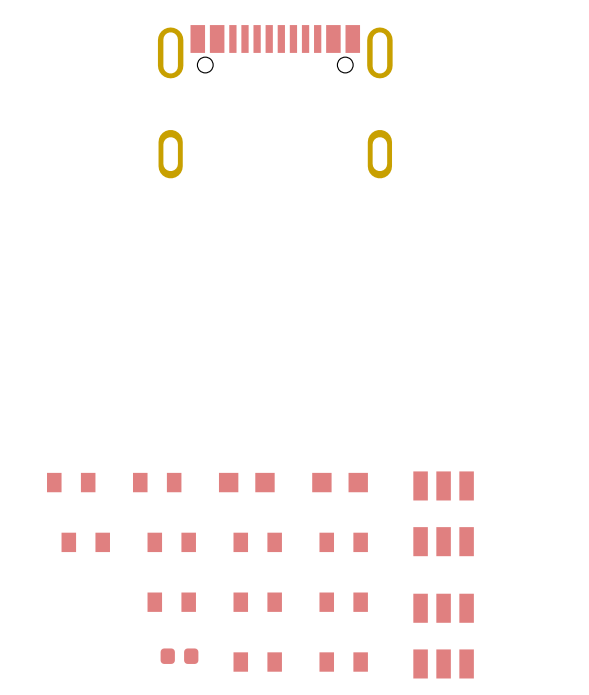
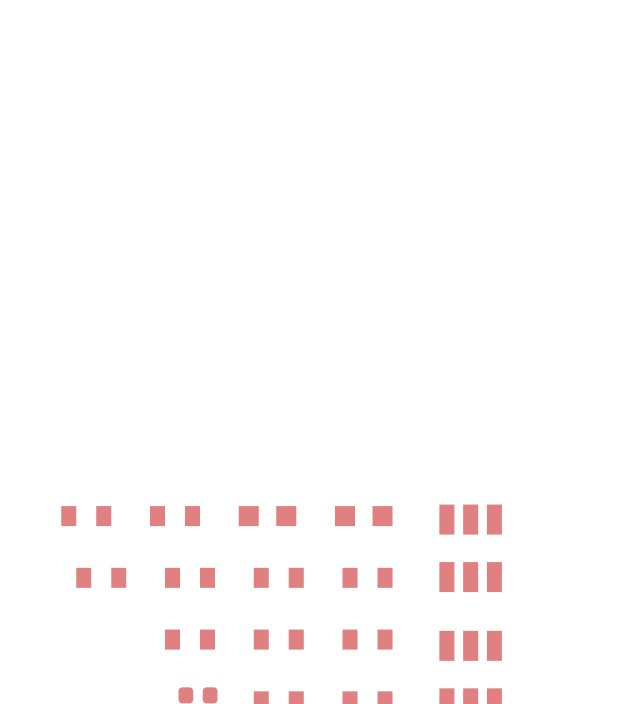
part: (275, 101) -> none

